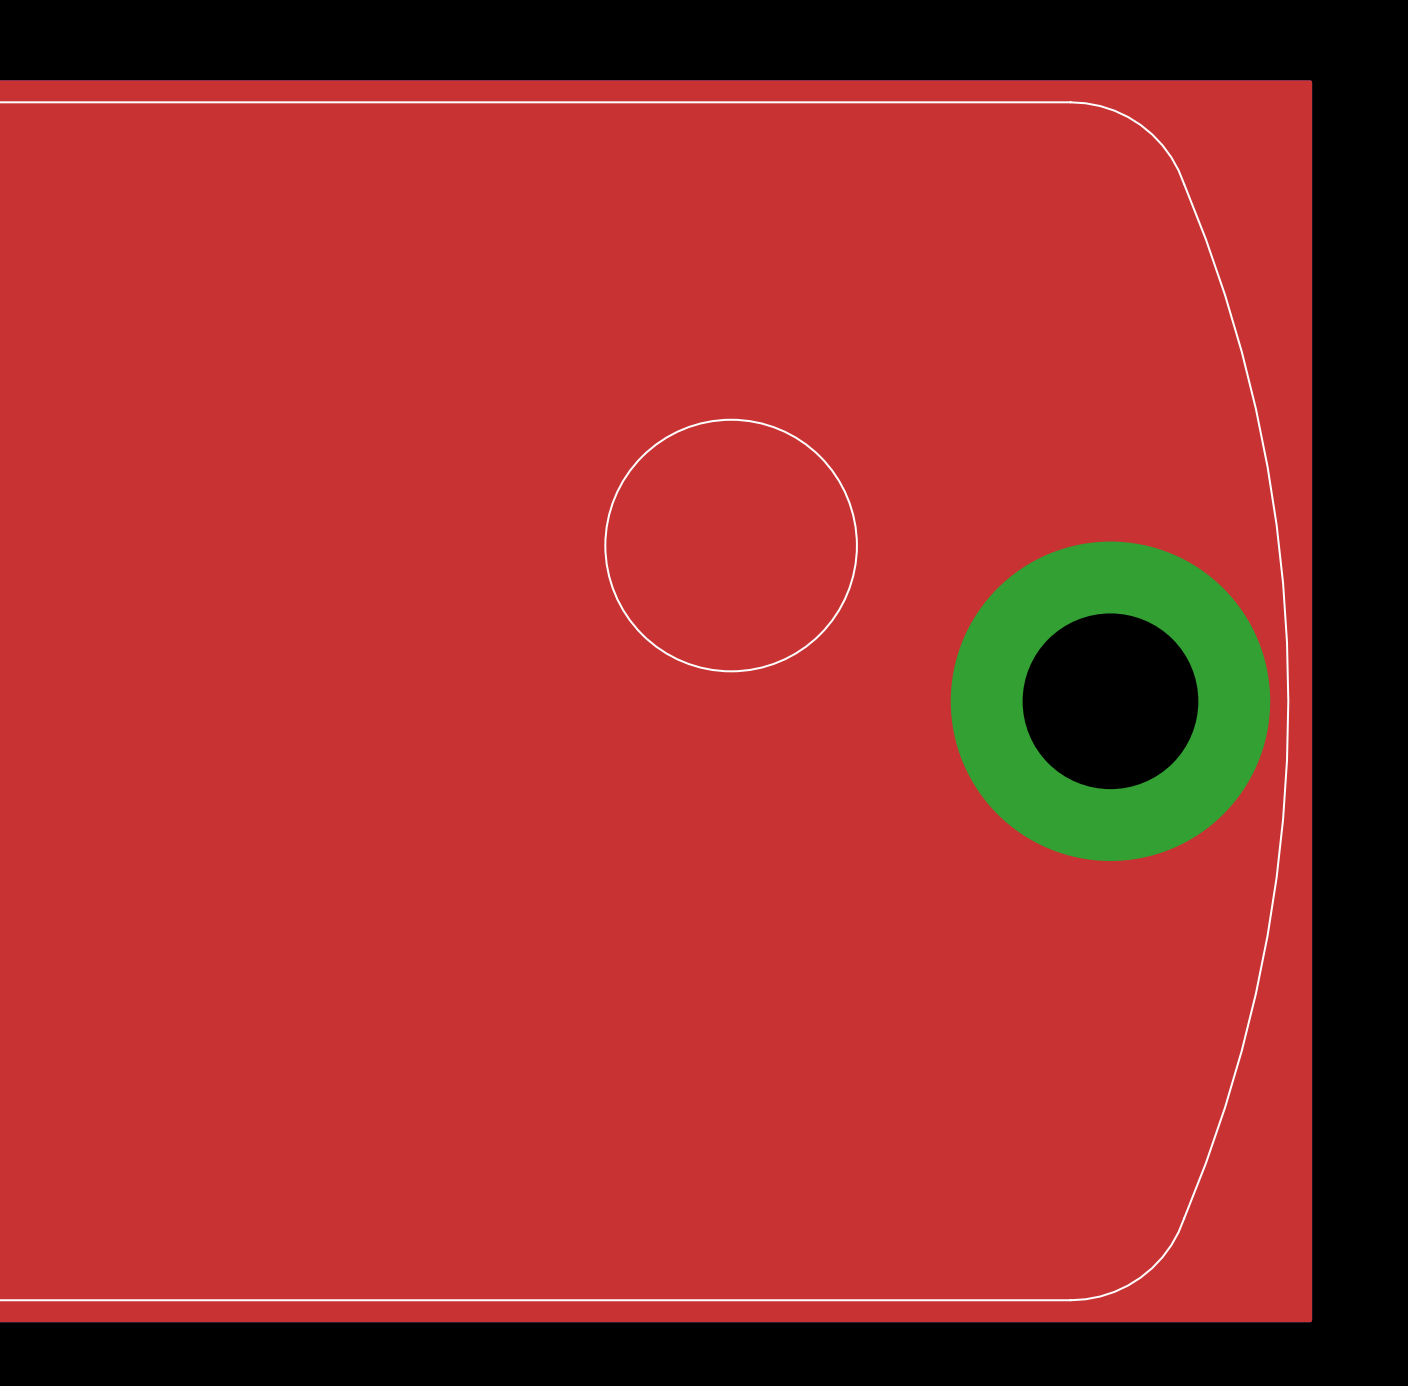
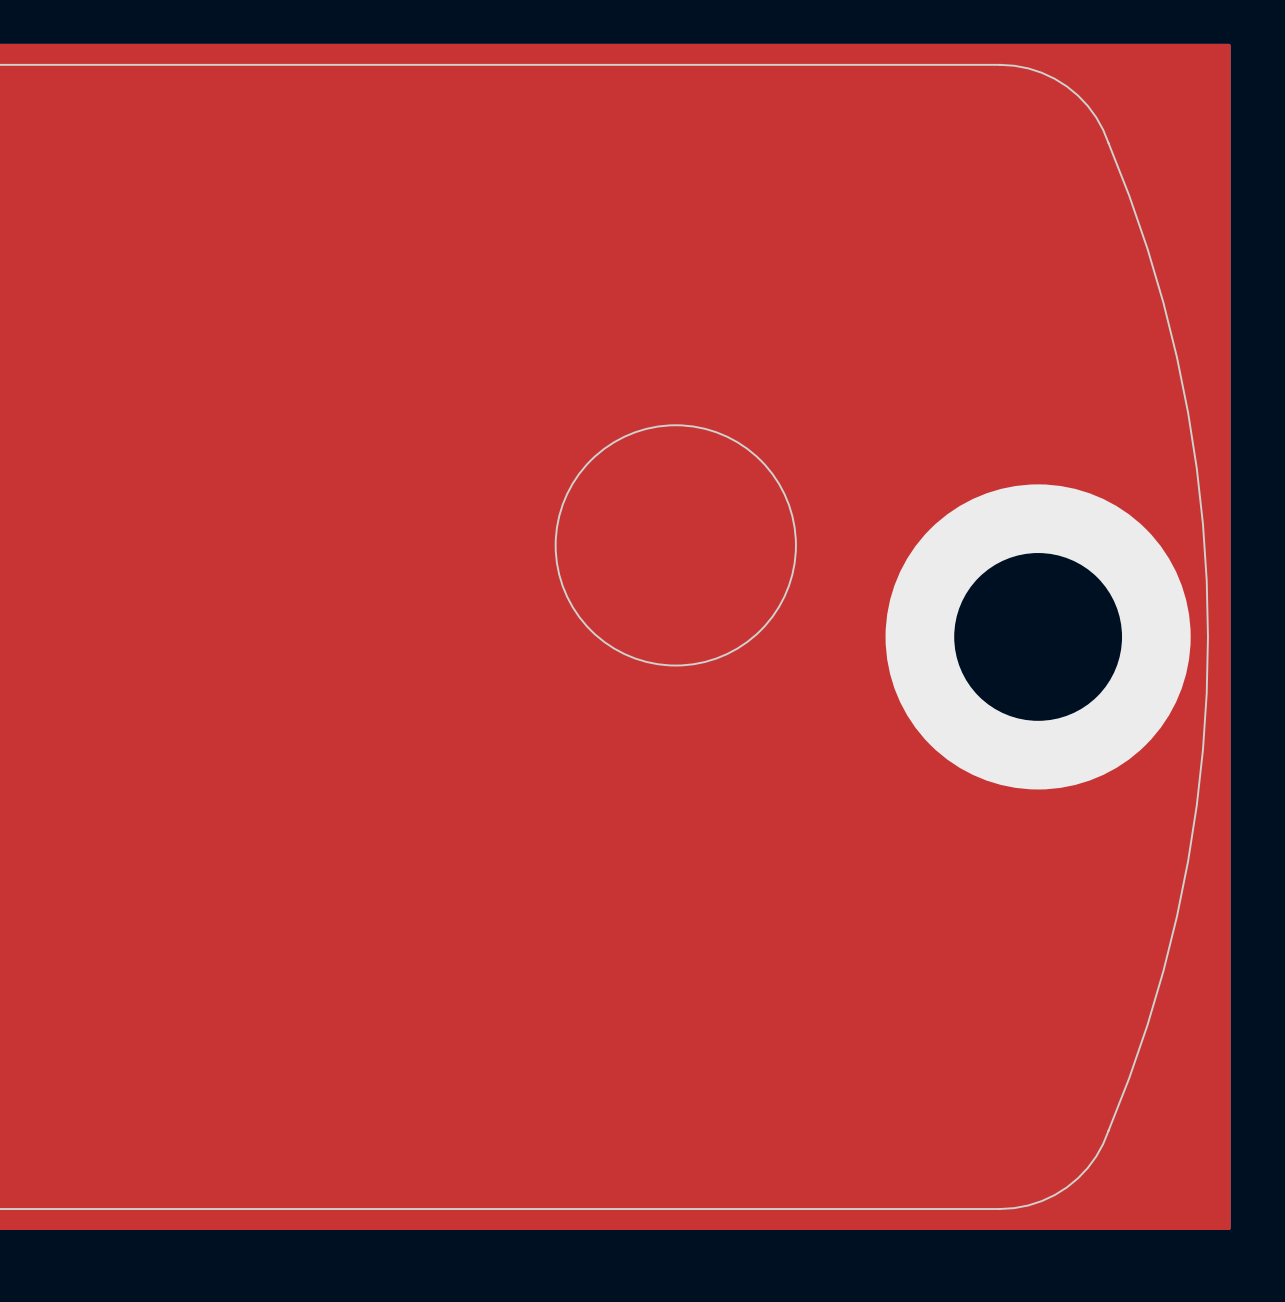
round board edge position: (731, 545) -> (675, 545)

